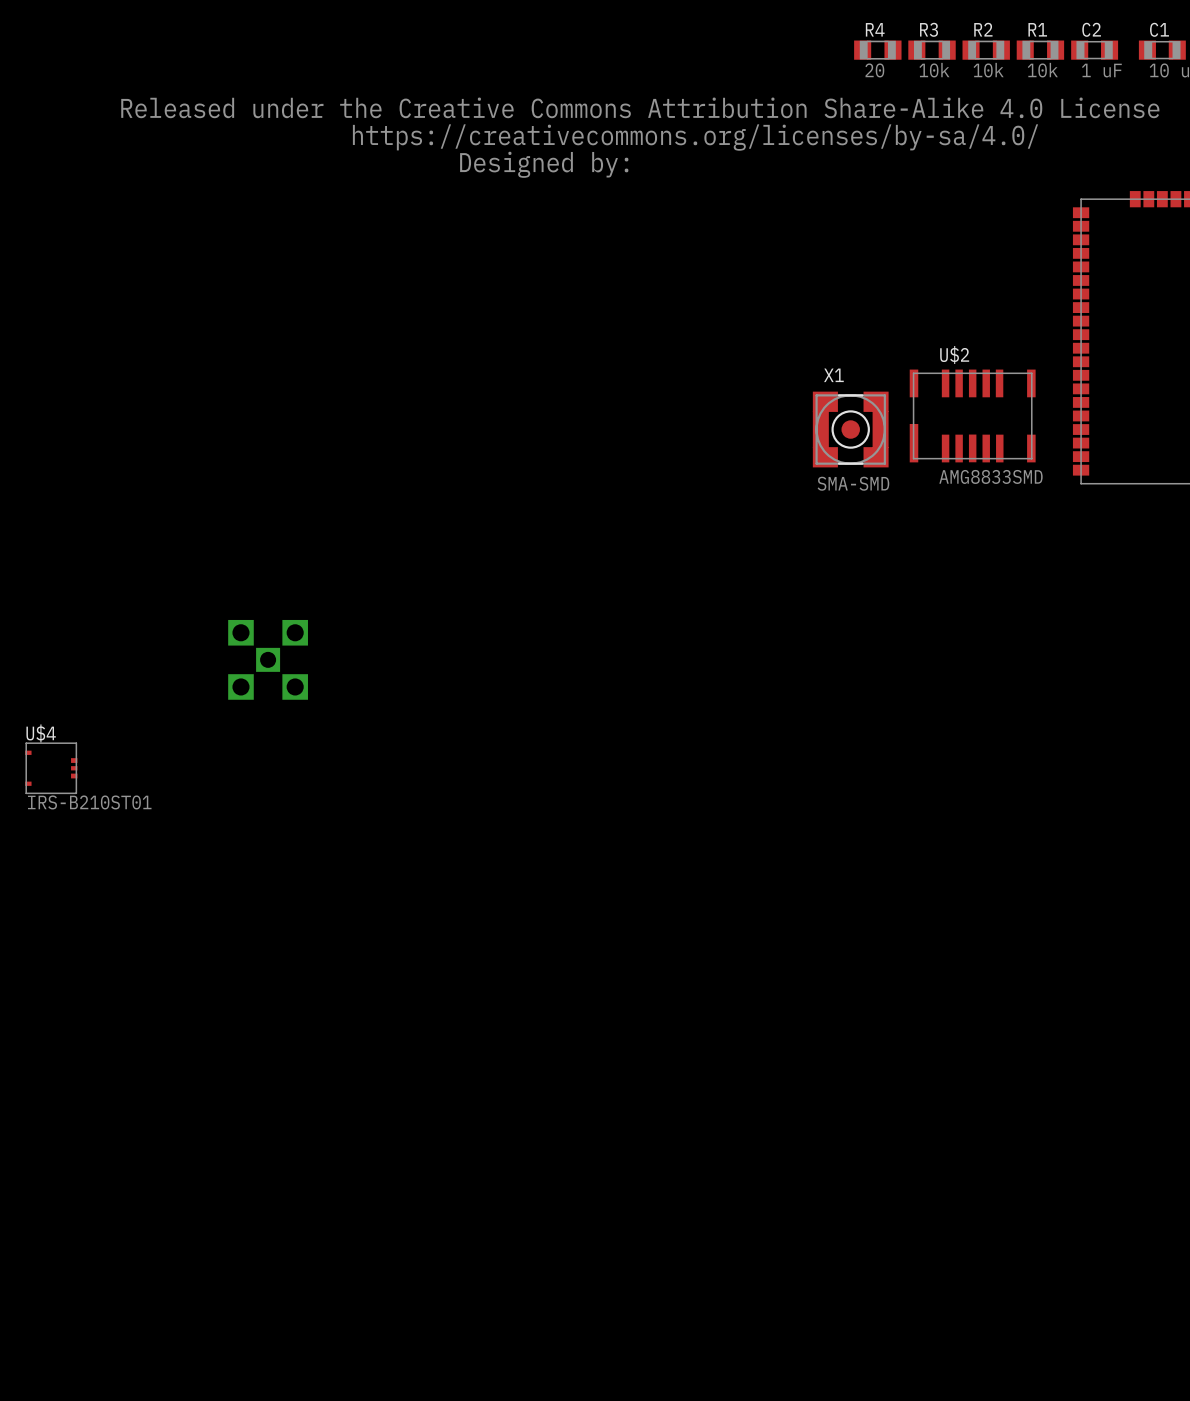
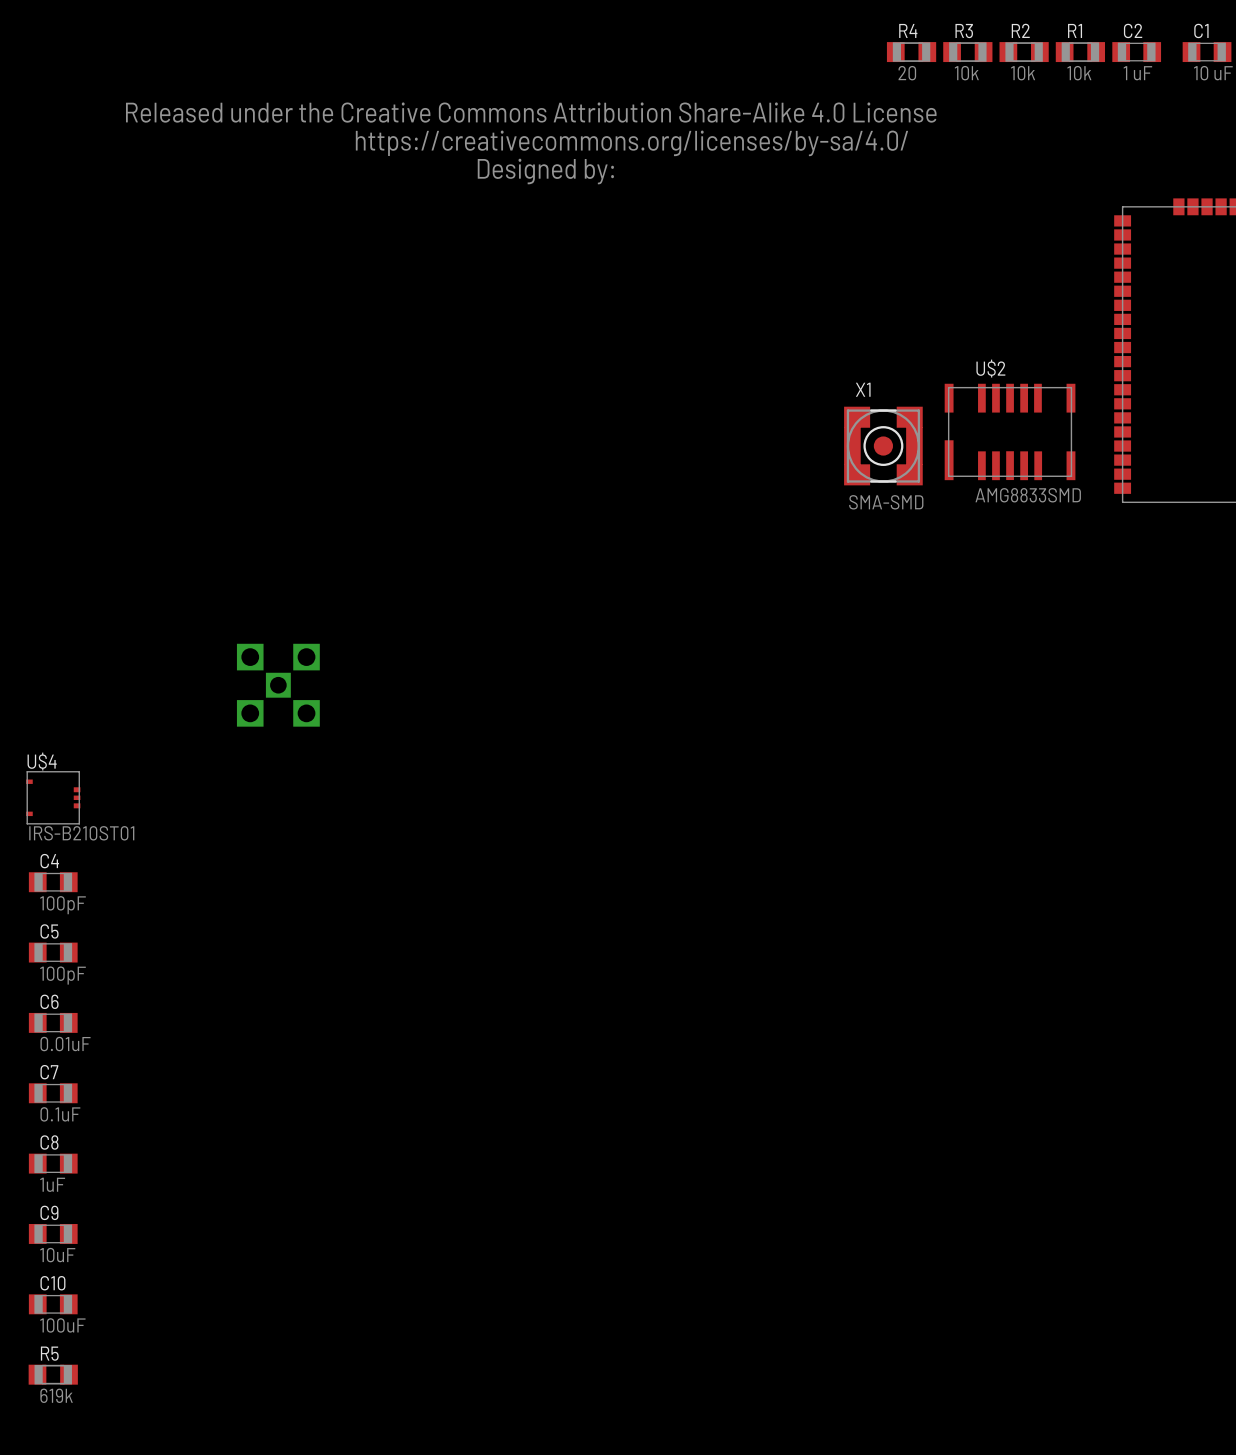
C4: none -> 100pF (53, 882)
C5: none -> 100pF (53, 952)
C6: none -> 0.01uF (53, 1022)
C7: none -> 0.1uF (53, 1093)
C8: none -> 1uF (53, 1163)
C9: none -> 10uF (53, 1233)
C10: none -> 100uF (53, 1304)
R5: none -> 619k (53, 1374)

